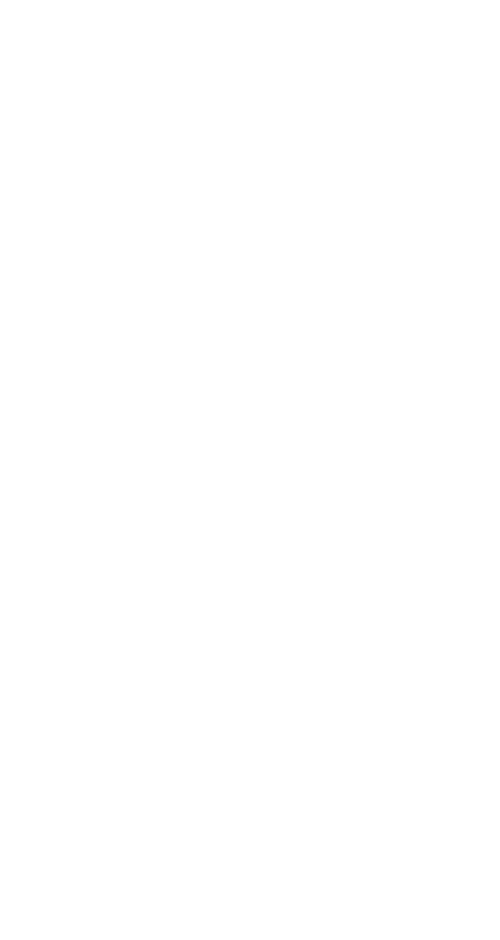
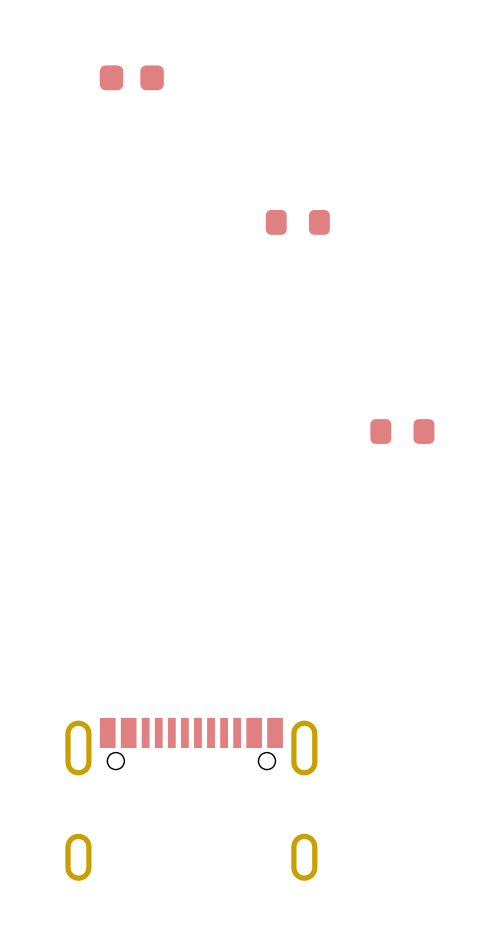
part: none -> (131, 77)
part: none -> (297, 222)
part: none -> (402, 431)
part: none -> (191, 799)

